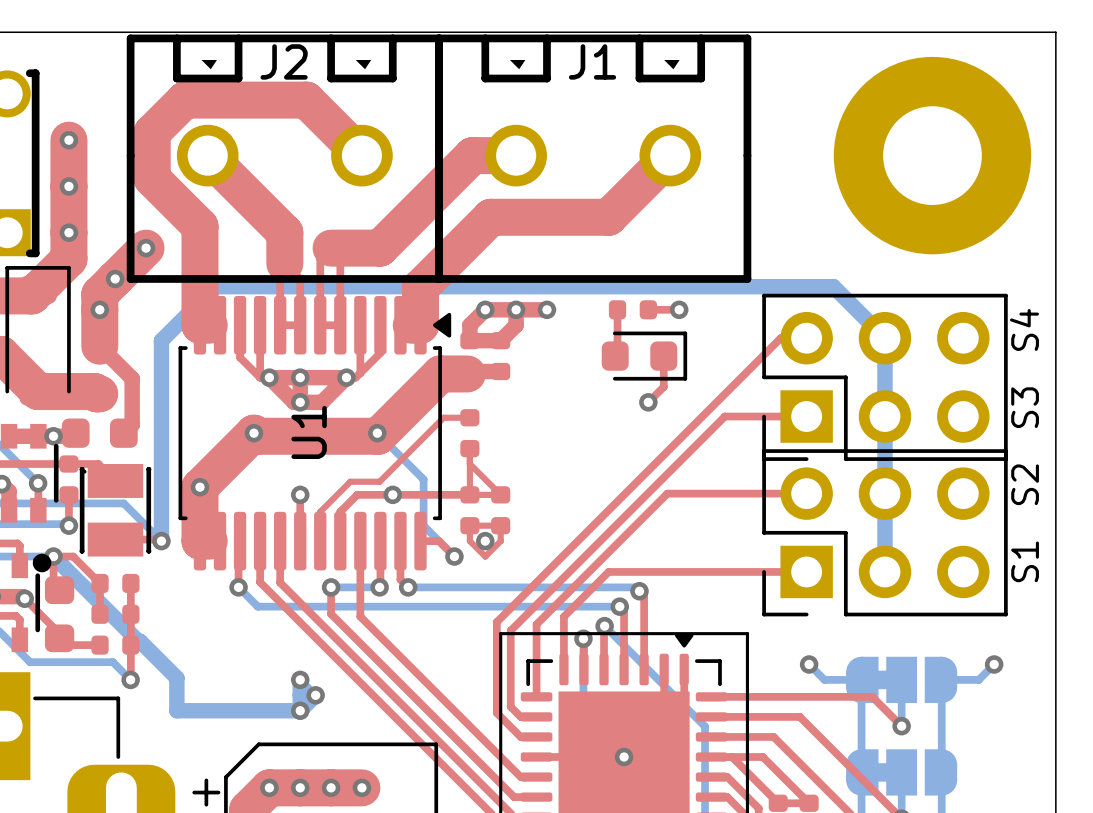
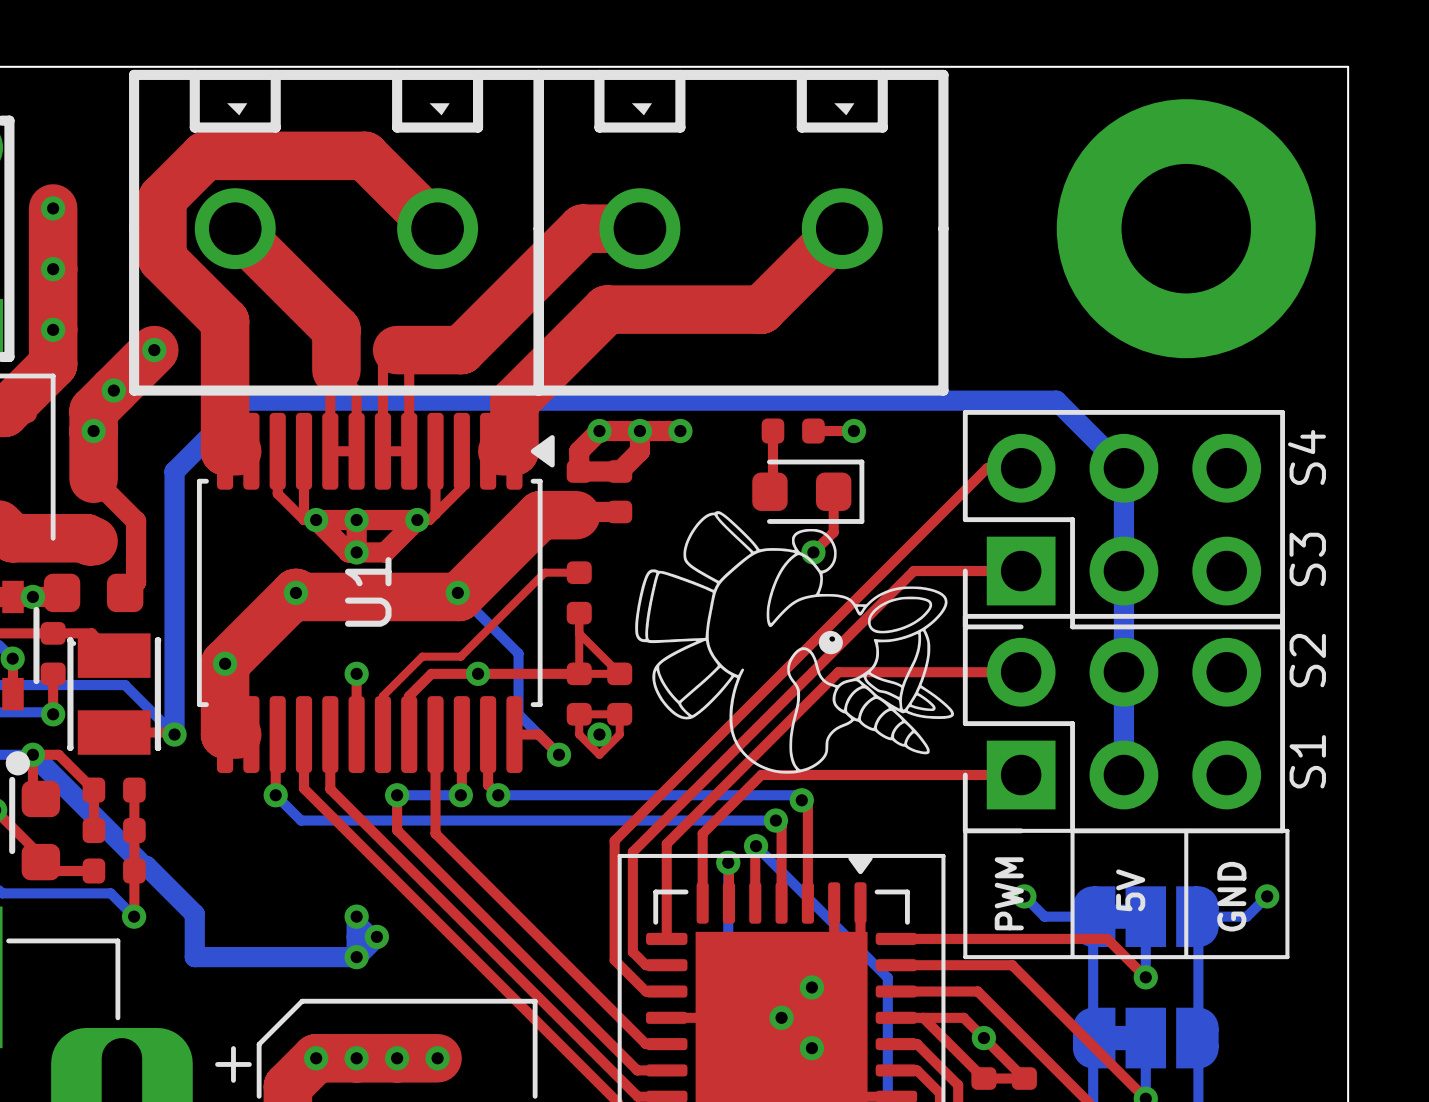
J2 name: J2 (284, 61) -> none
J1 name: J1 (592, 61) -> none
drawing: none -> [635, 511, 954, 774]
line: none -> (965, 830) (1287, 830) (1287, 957) (965, 957) (965, 830)
line: none -> (1072, 830) (1072, 957)
line: none -> (1186, 830) (1186, 957)
text: none -> 5V (1130, 890)
text: none -> PWM (1009, 893)
text: none -> GND (1231, 896)
via: none -> (811, 987)
via: none -> (983, 1038)
via: none -> (811, 1048)

